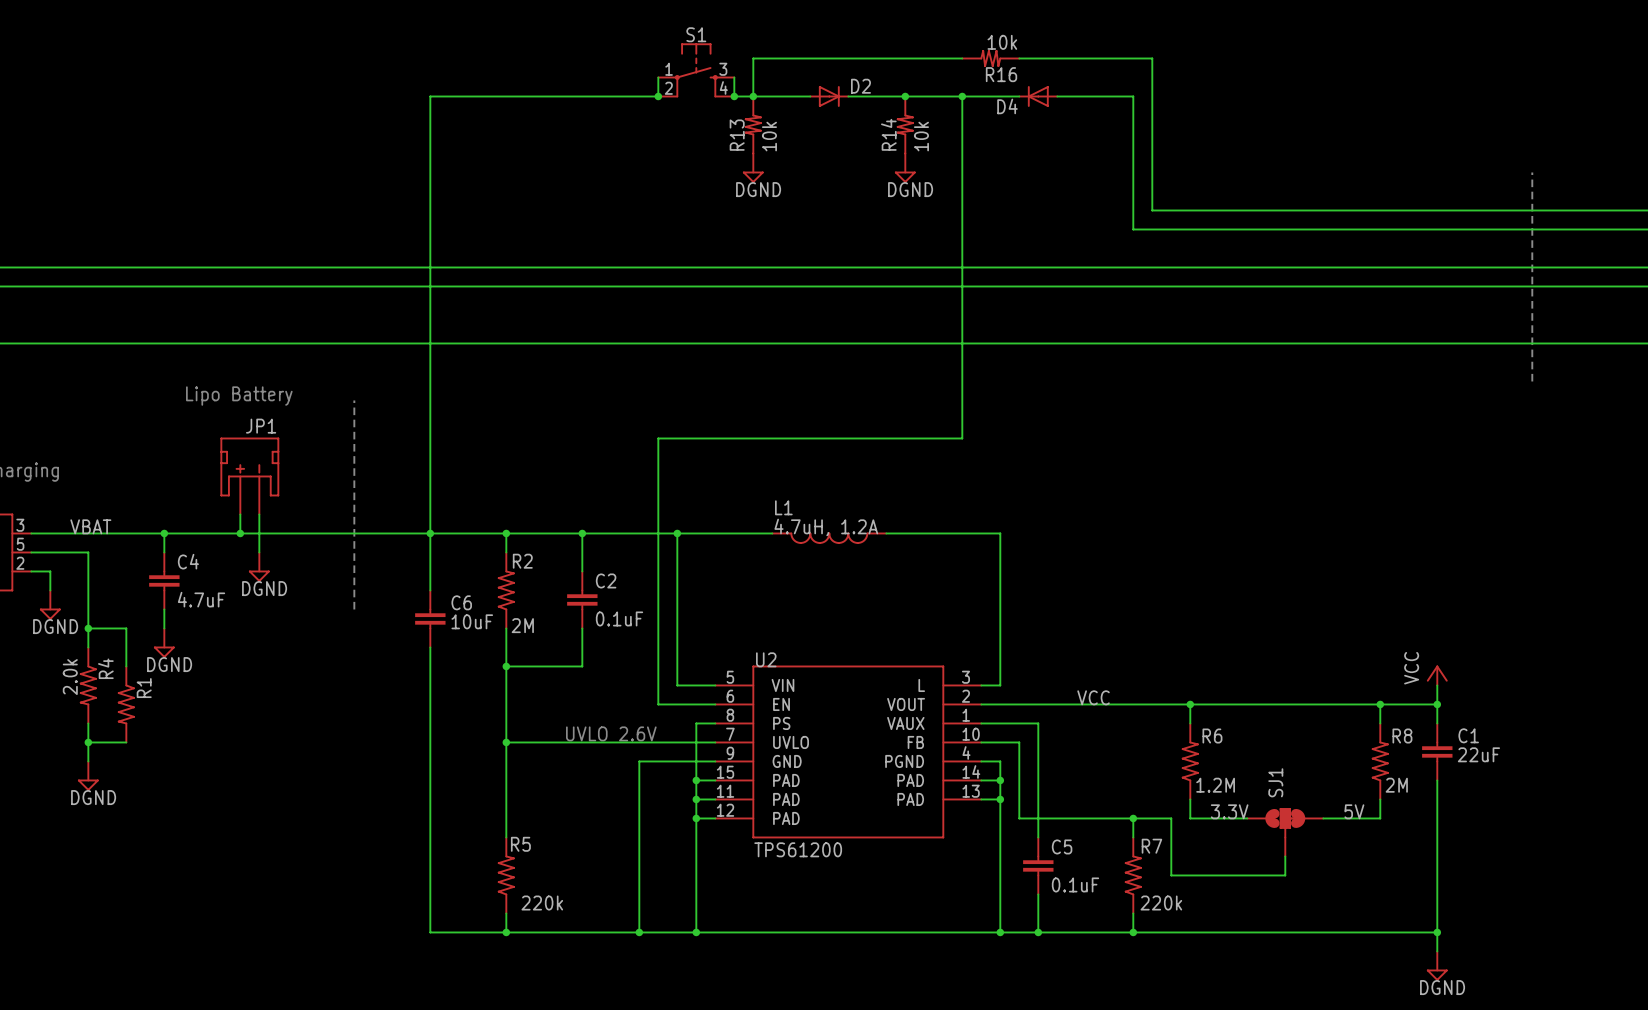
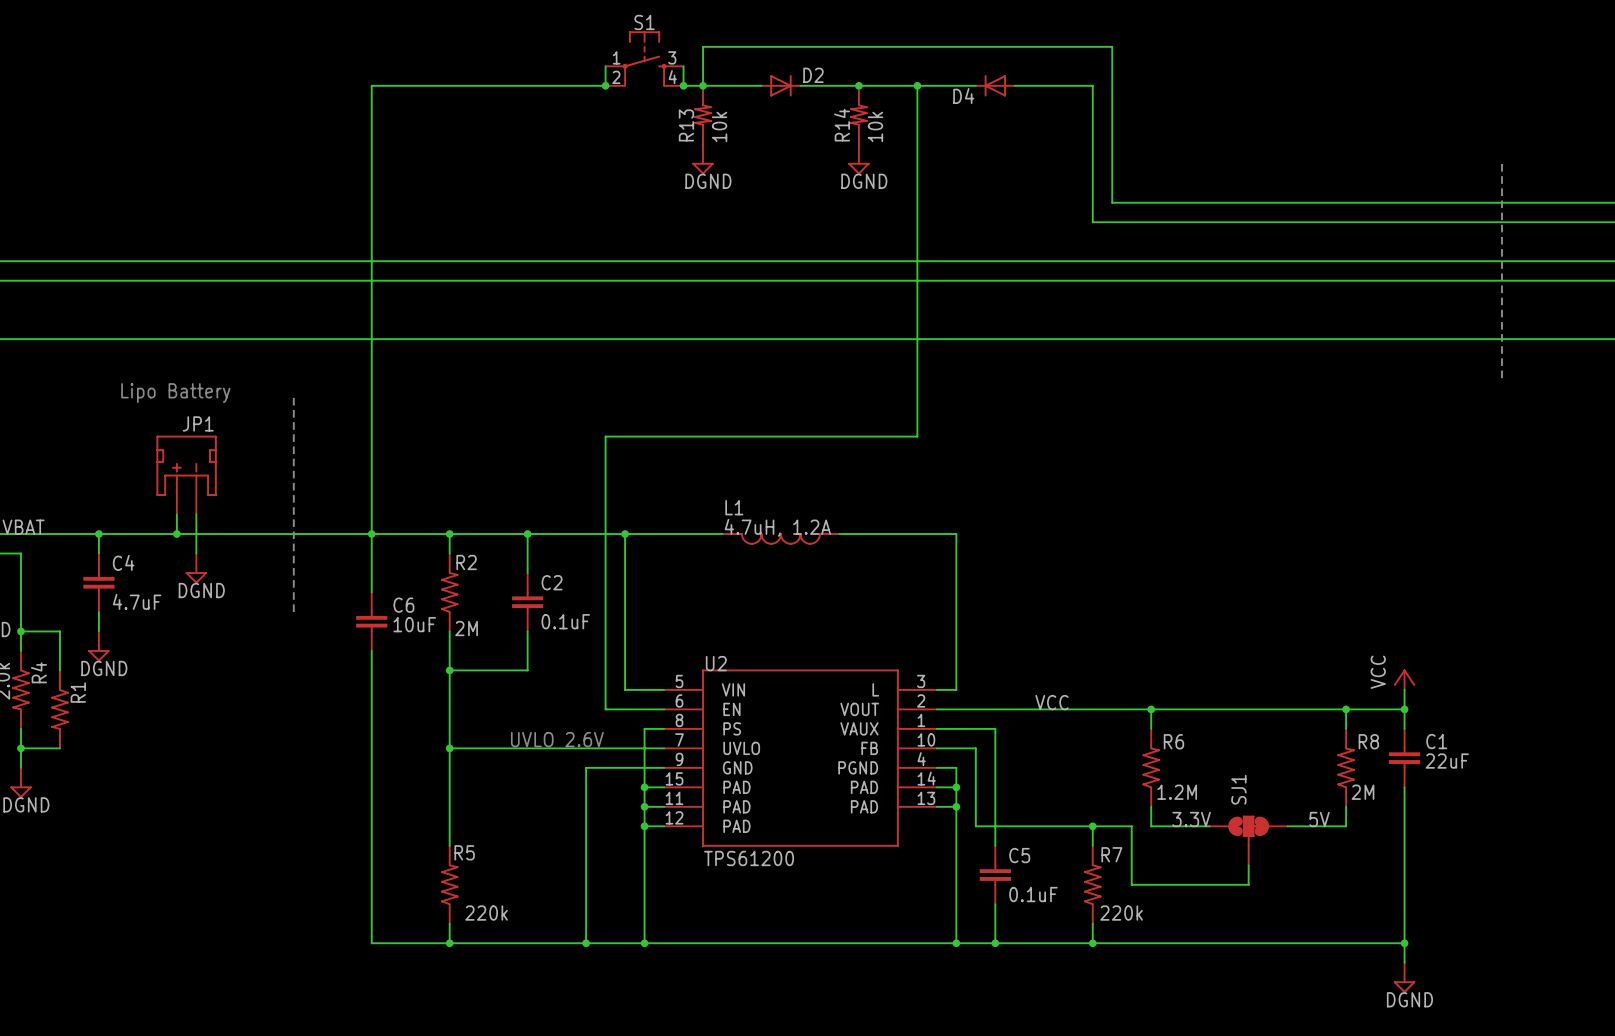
R16: 10k (990, 58) -> none

